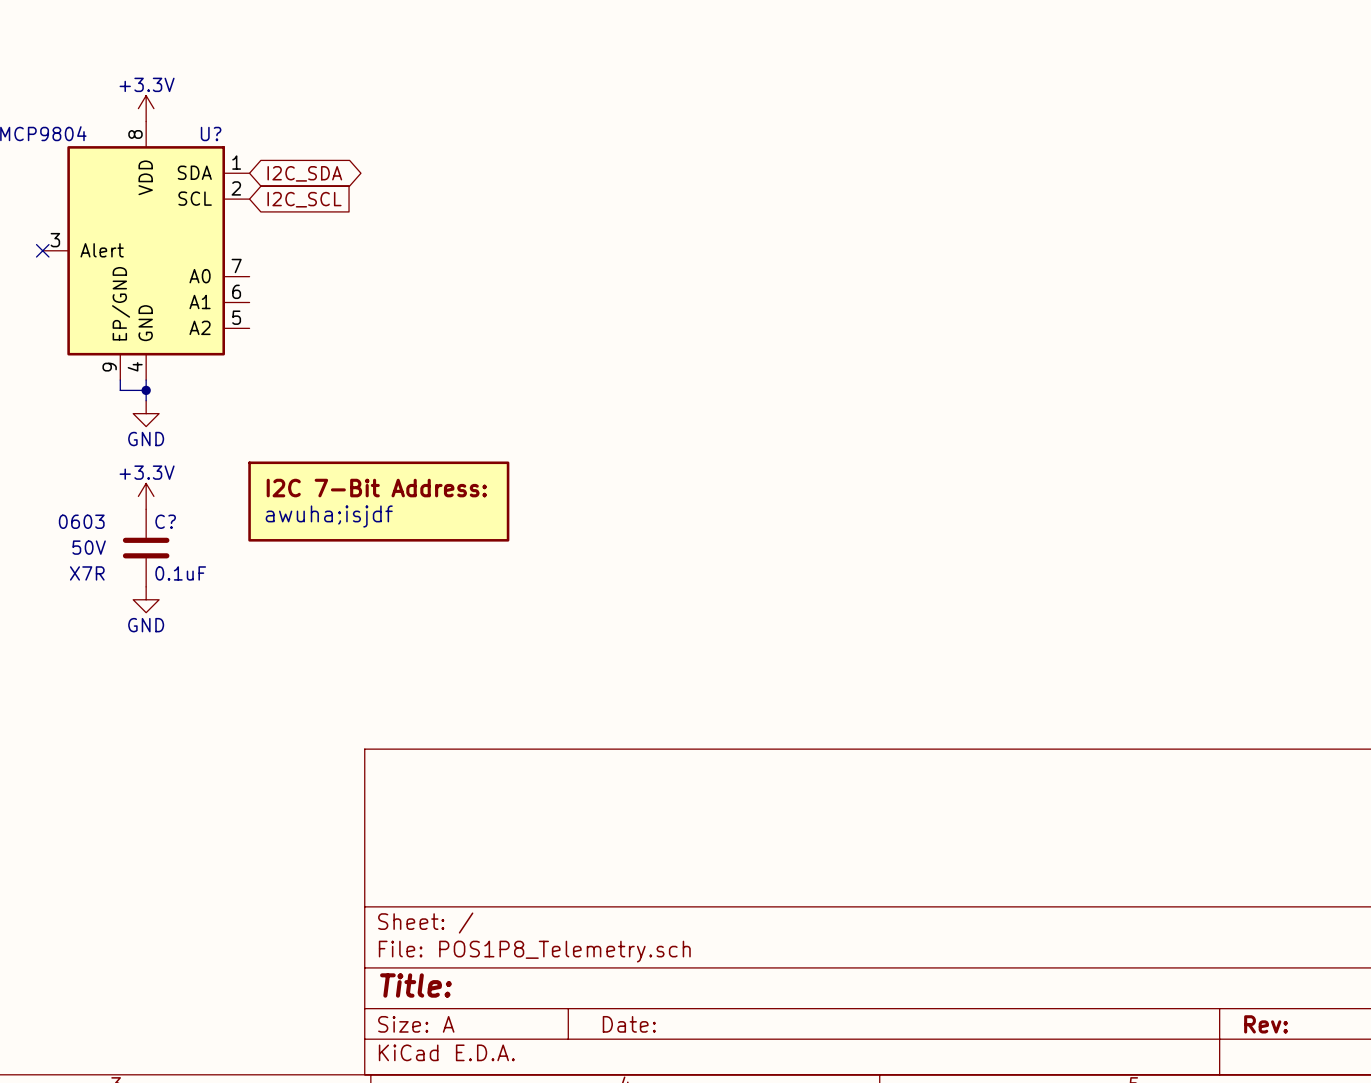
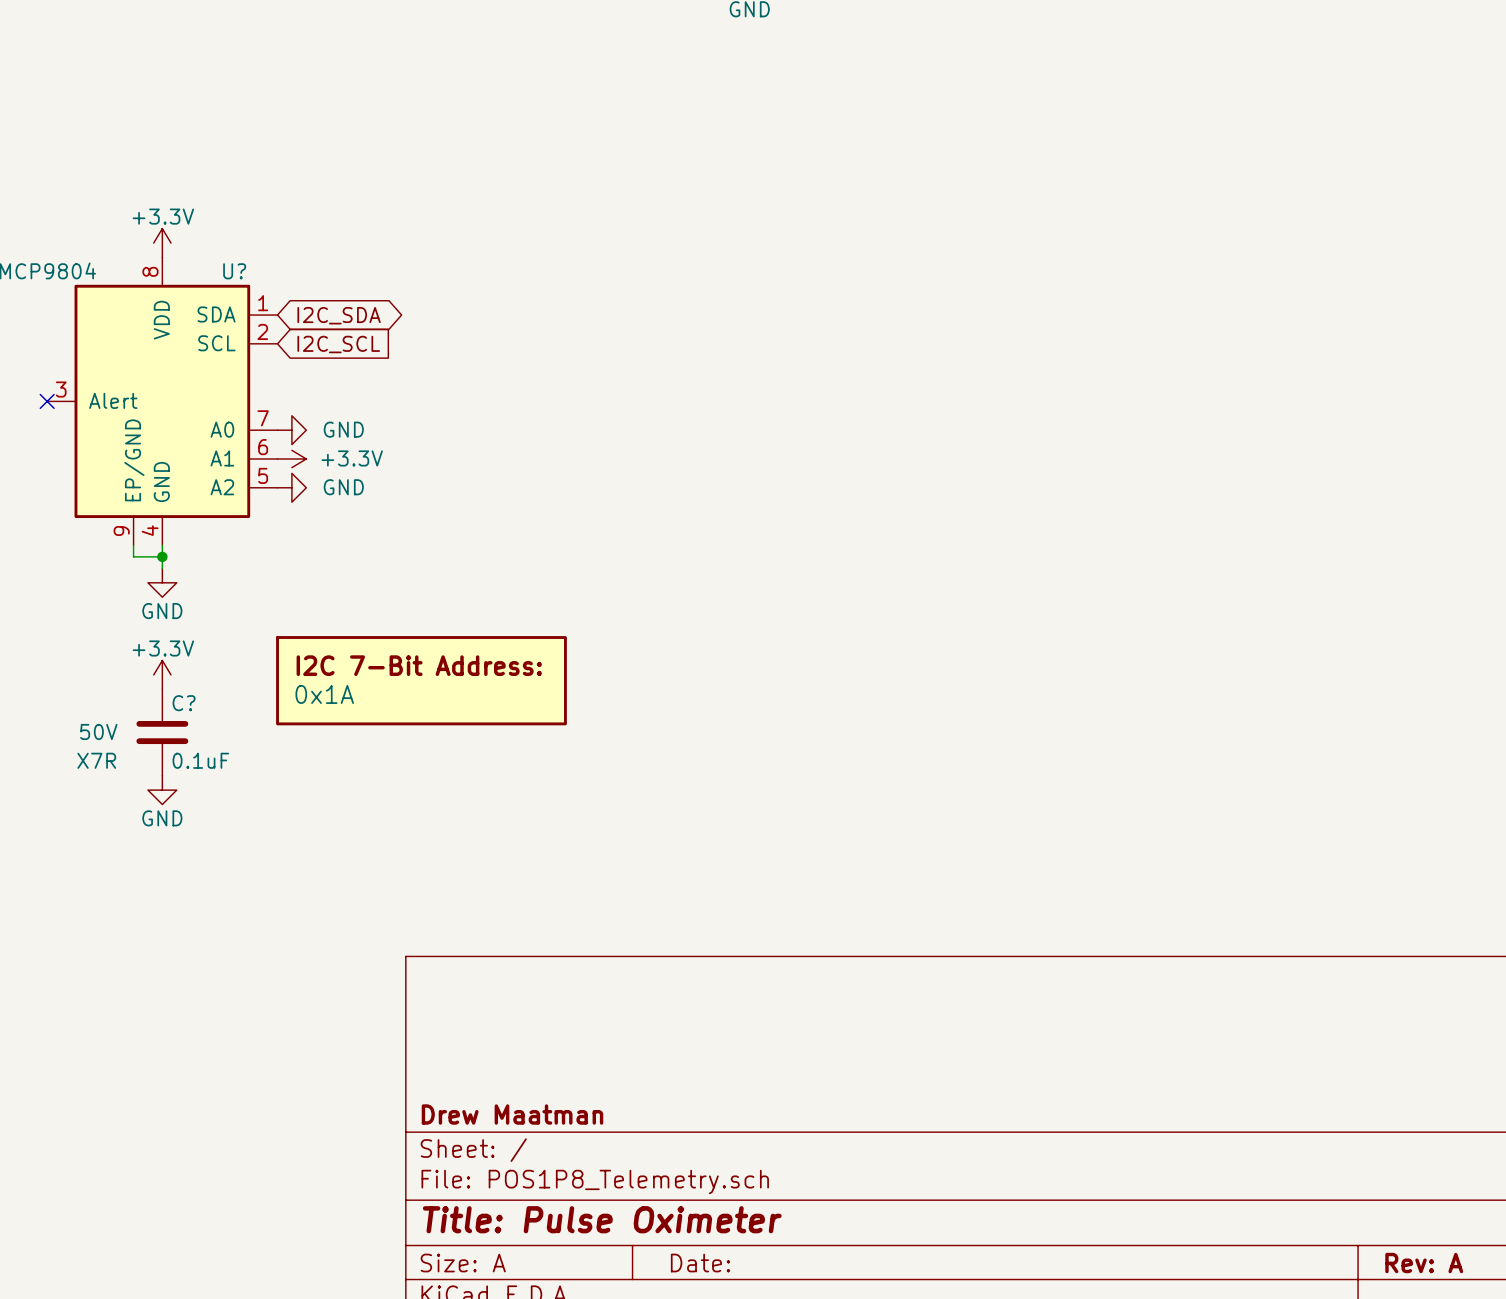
power symbol: none -> GND (291, 430)
power symbol: none -> +3.3V (291, 458)
power symbol: none -> GND (291, 487)
part value: awuha;isjdf (329, 516) -> 0x1A (324, 694)
C? text: 0603 (81, 521) -> none
title block: none -> Drew Maatman (512, 1114)
title block: Title: (415, 985) -> Title: Pulse Oximeter (602, 1219)
title block: Rev: (1266, 1024) -> Rev: A (1424, 1263)

